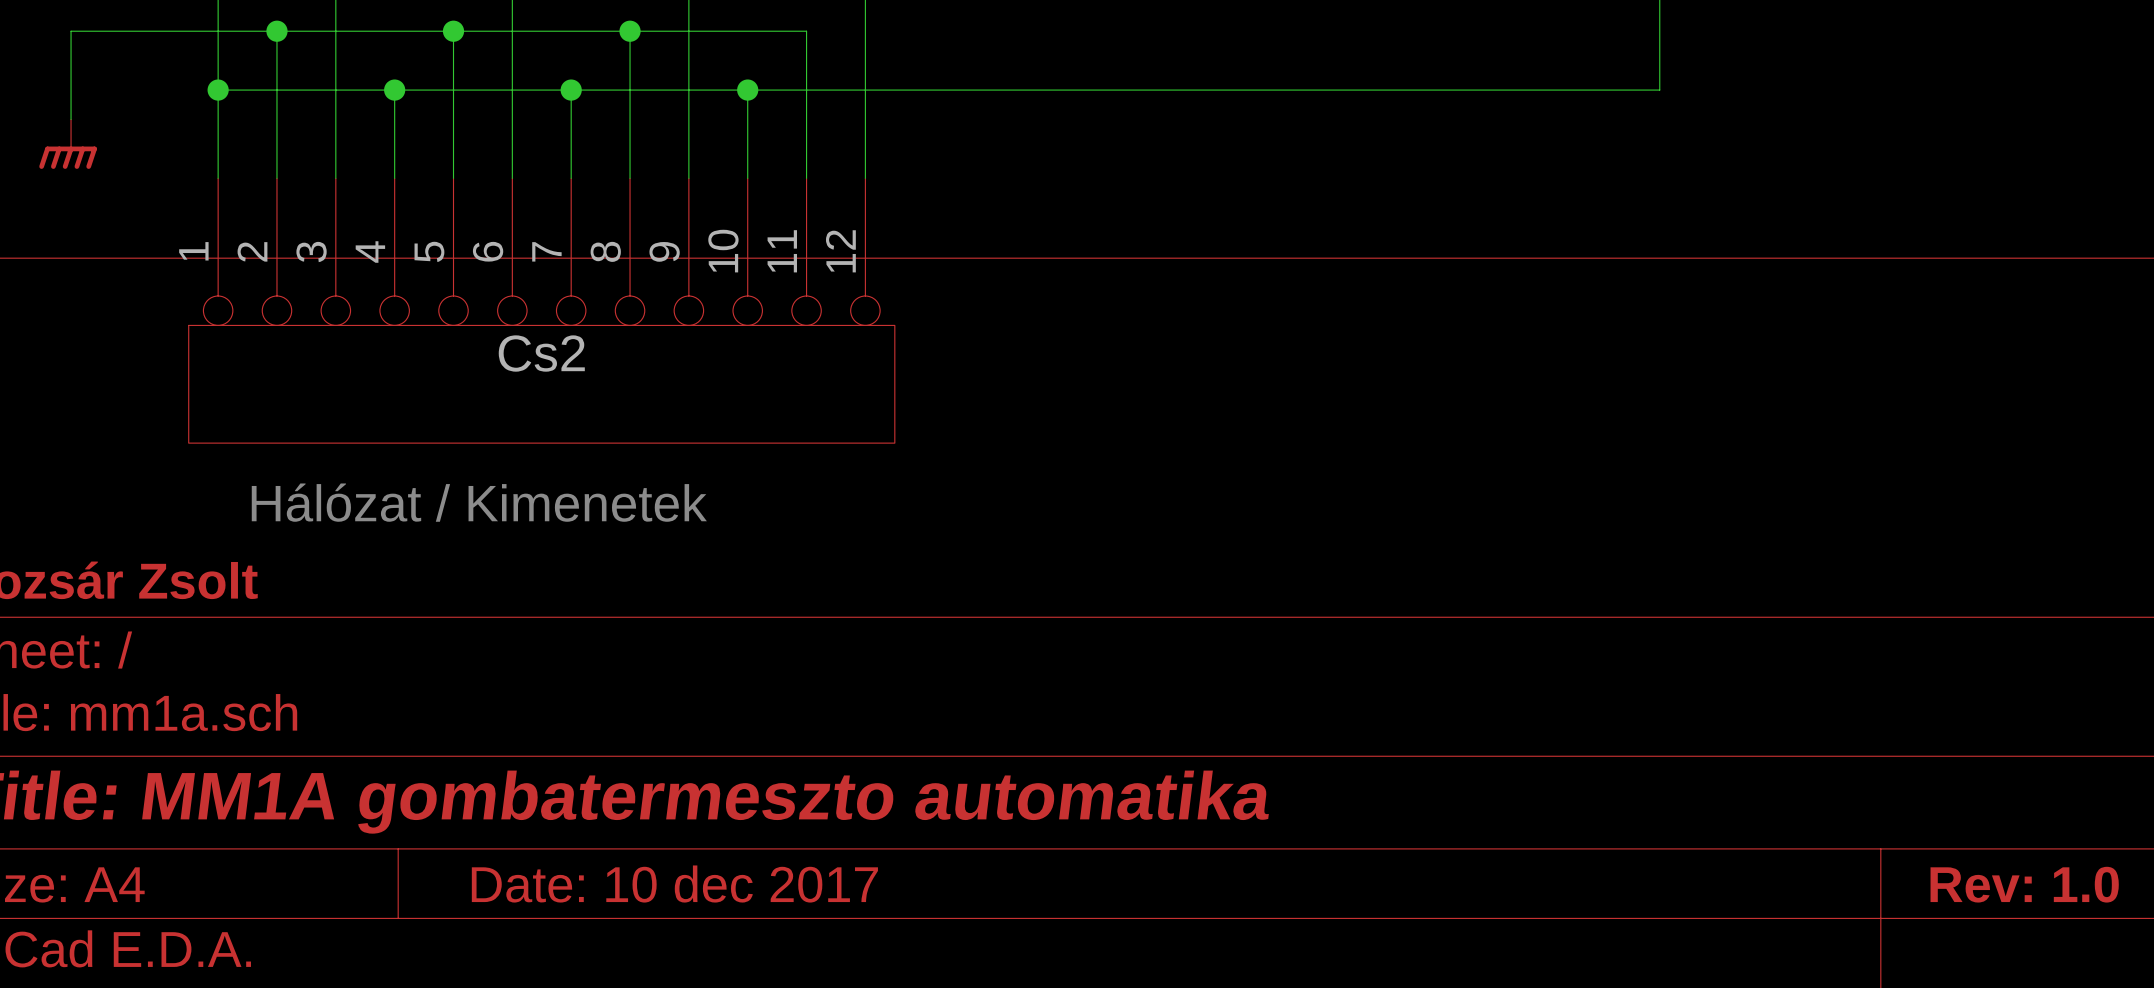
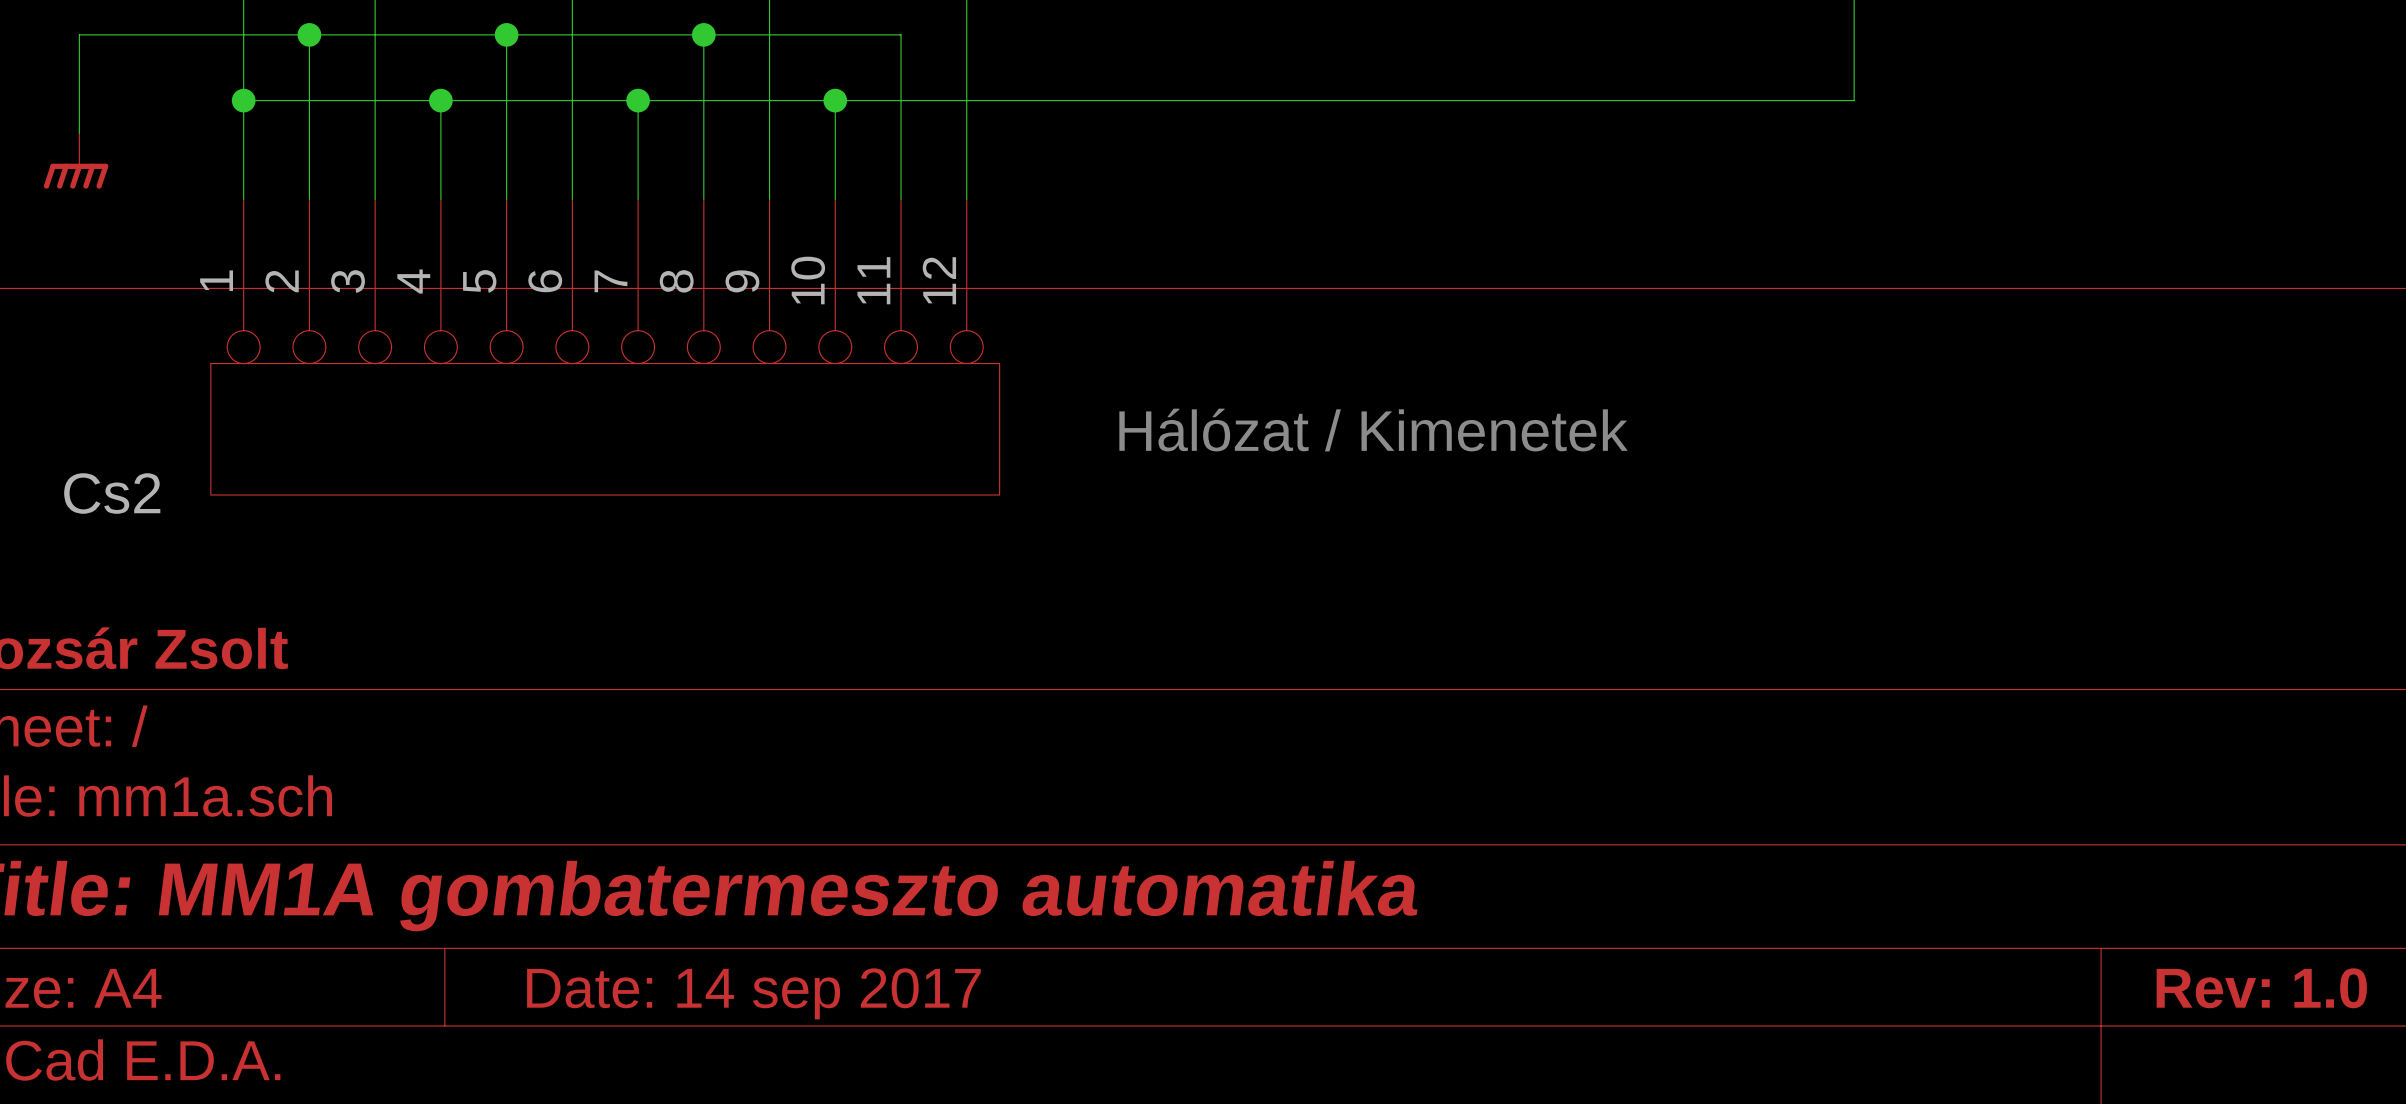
Cs2 name position: Cs2 (541, 353) -> Cs2 (112, 493)
text: none -> Hálózat / Kimenetek (1373, 430)
text: Hálózat / Kimenetek (479, 502) -> none
title block: Date: 10 dec 2017 (674, 884) -> Date: 14 sep 2017 (753, 993)

